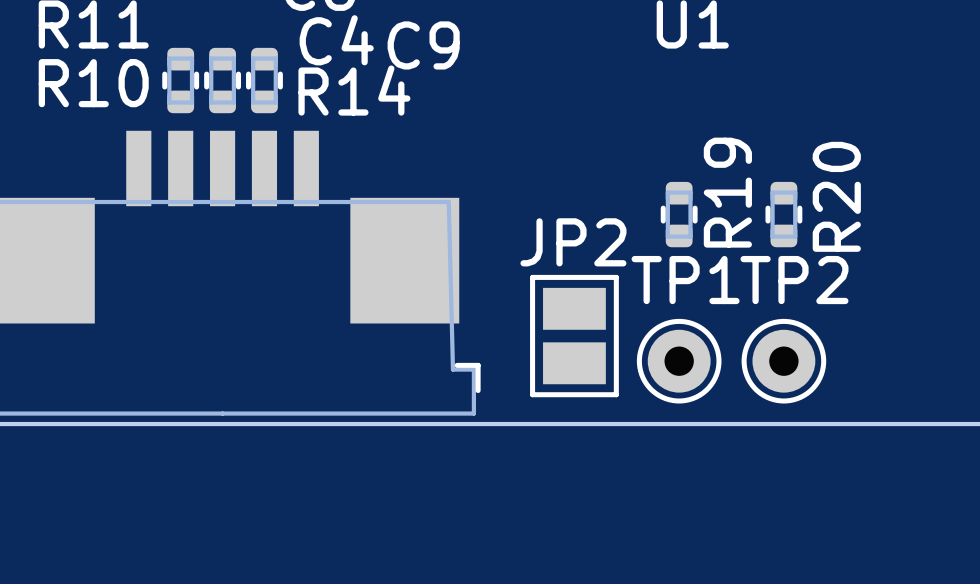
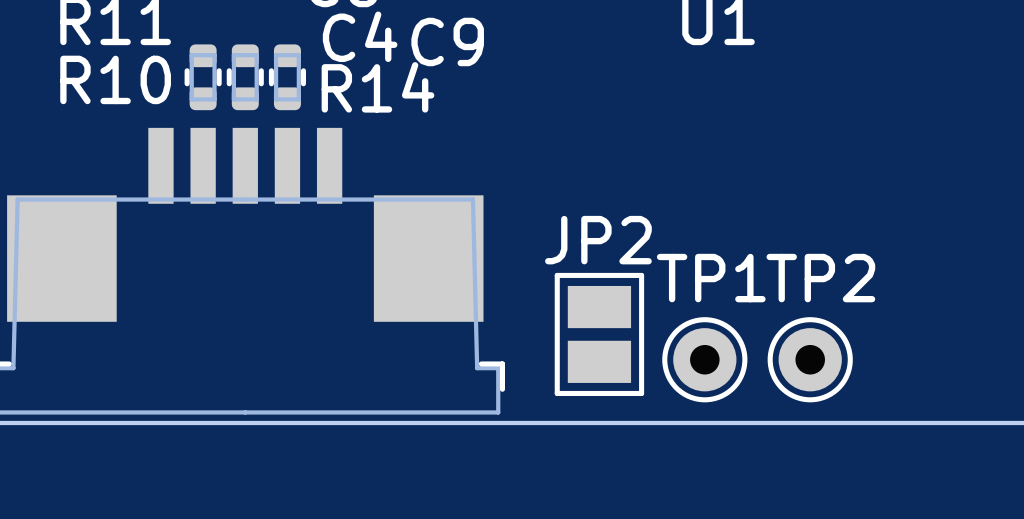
R19: (679, 214) -> none
R20: (783, 214) -> none

